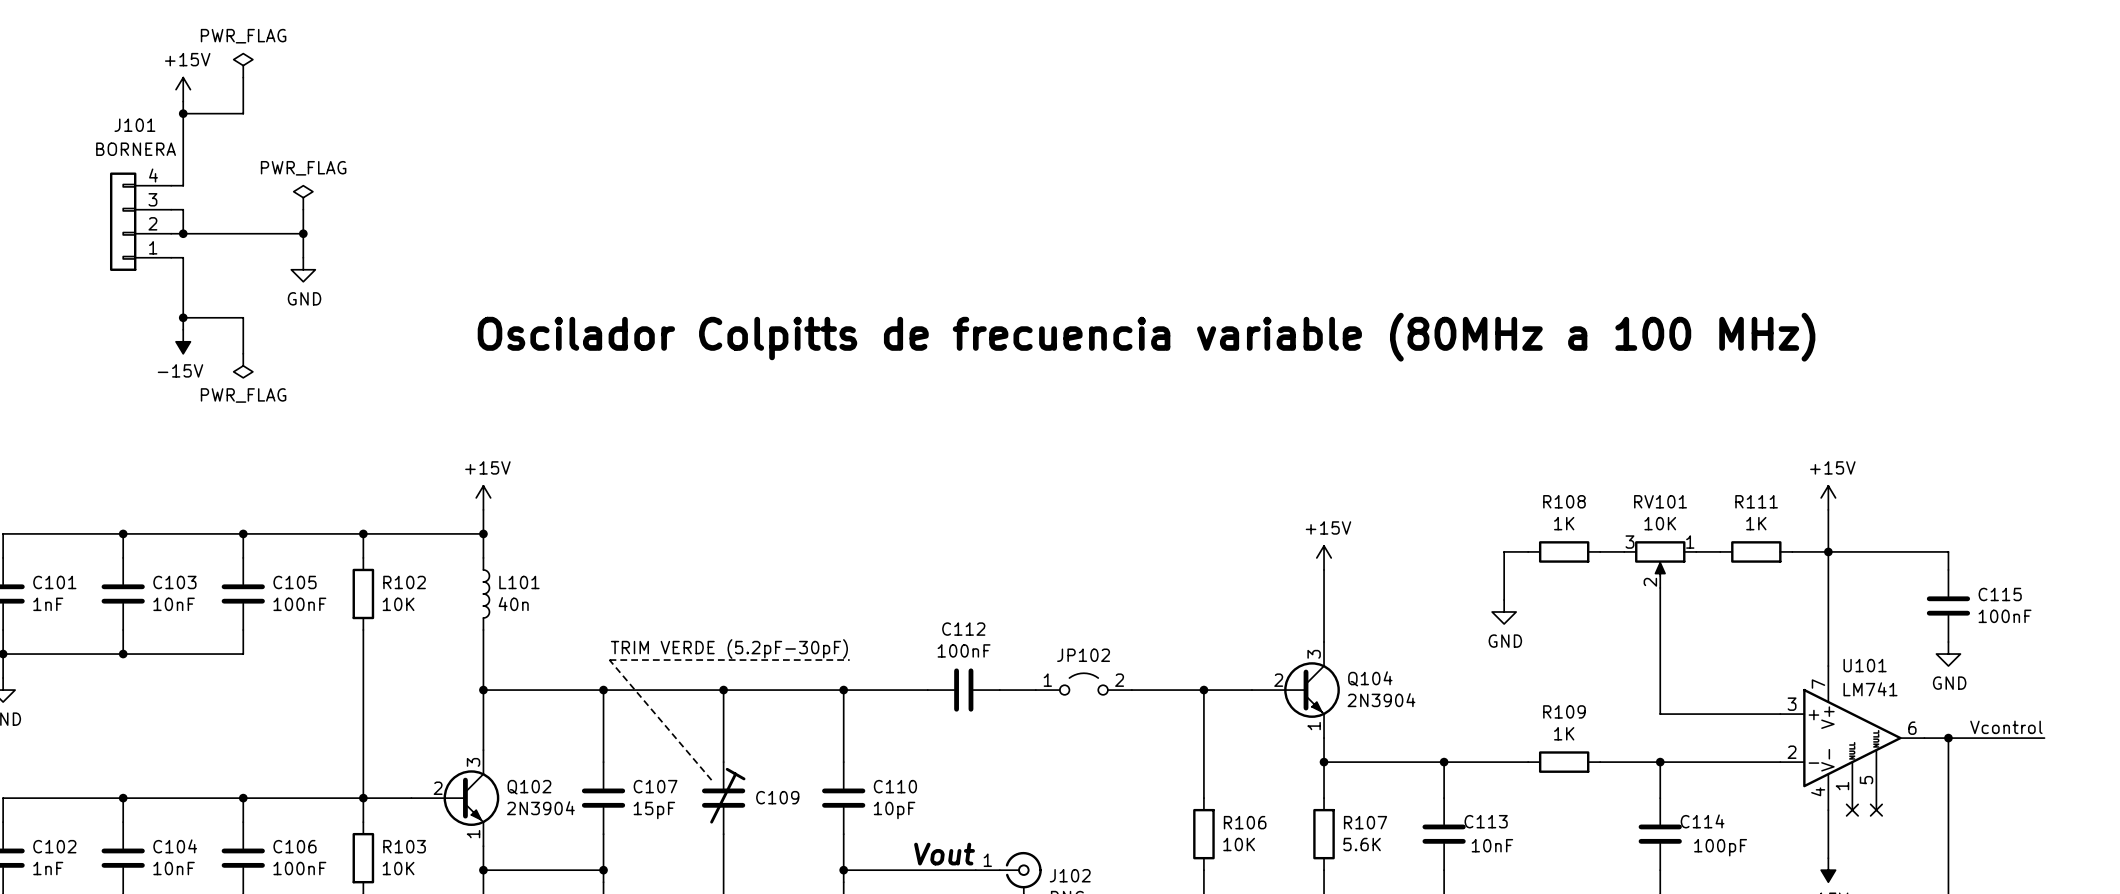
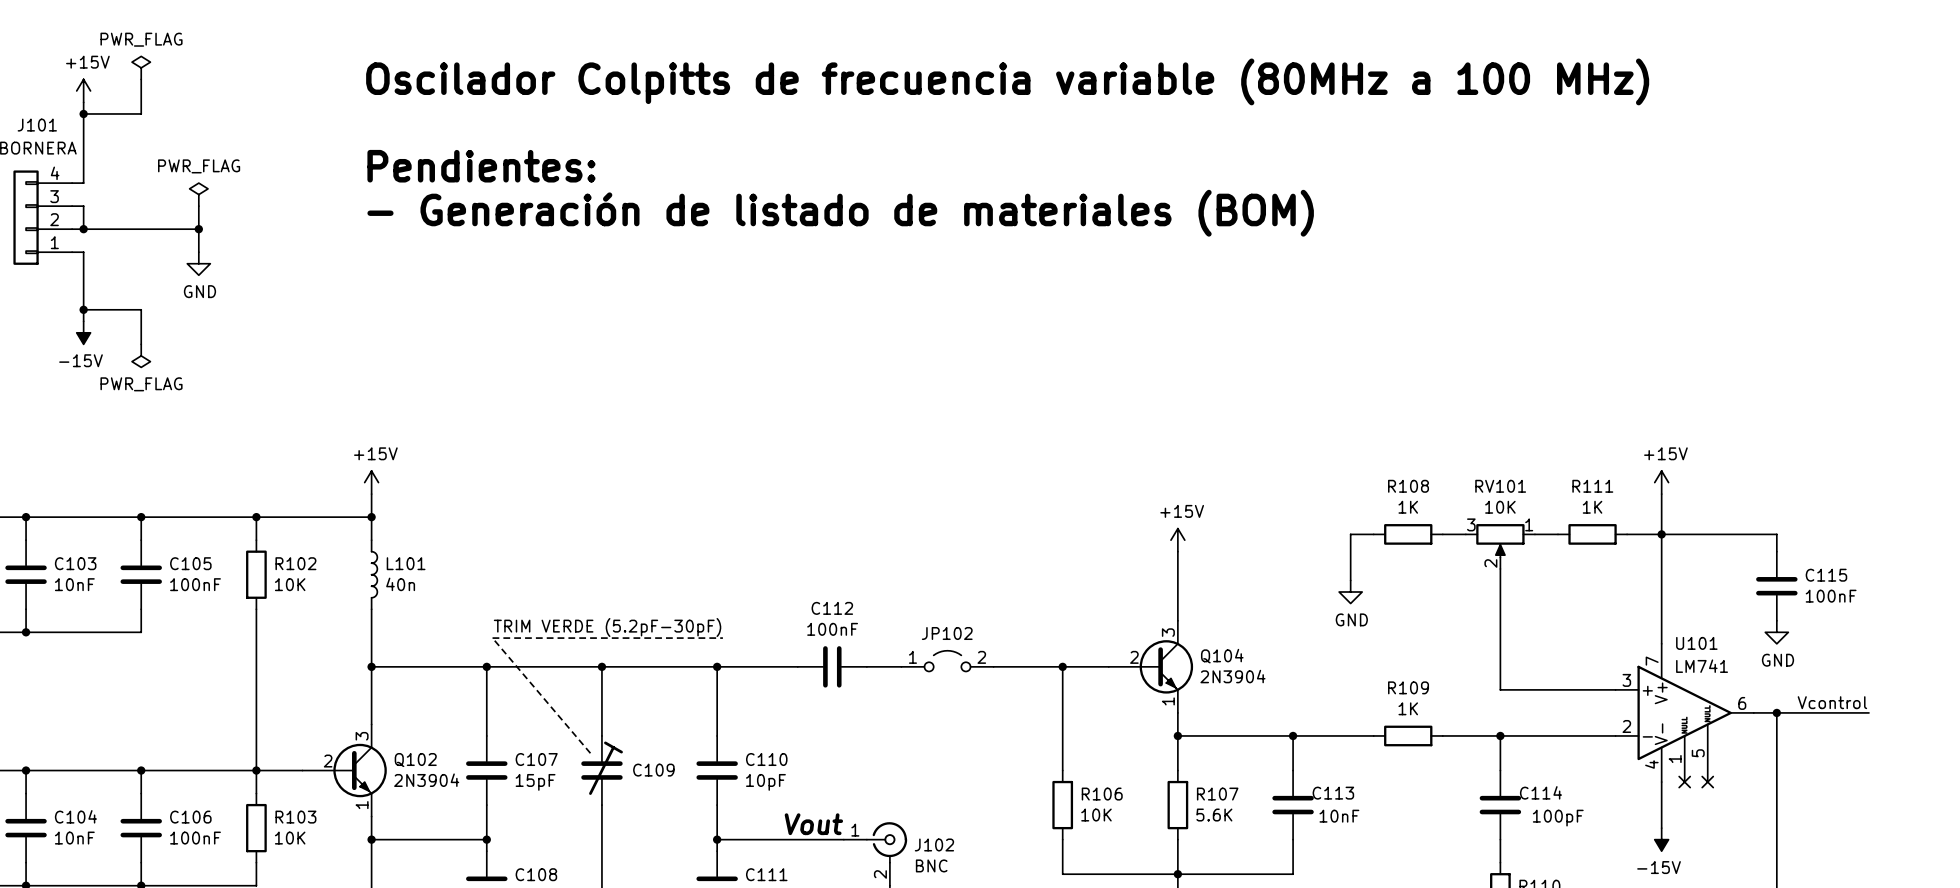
text: none -> Oscilador Colpitts de frecuencia variable (80MHz a 100 MHz) (1007, 81)
text: none -> Pendientes: (481, 166)
text: none -> - Generación de listado de materiales (BOM) (840, 213)
text: Oscilador Colpitts de frecuencia variable (80MHz a 100 MHz) (1146, 337) -> none

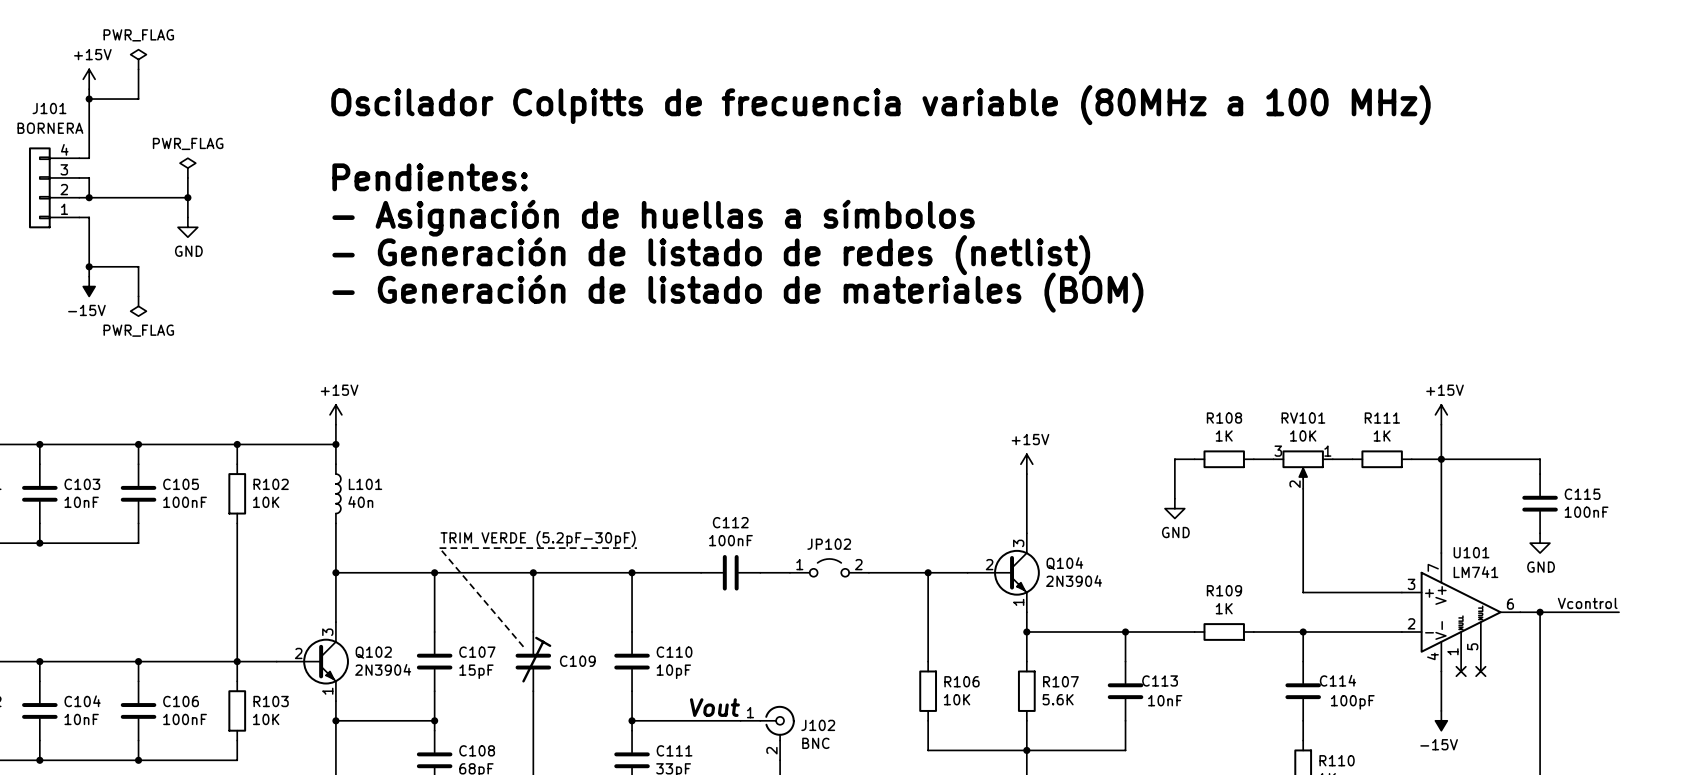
text position: Oscilador Colpitts de frecuencia variable (80MHz a 100 MHz) (1007, 81) -> Oscilador Colpitts de frecuencia variable (80MHz a 100 MHz) (880, 105)
text: Pendientes: (481, 166) -> none
text: - Generación de listado de materiales (BOM) (840, 213) -> Pendientes: (430, 177)
text: none -> - Asignación de huellas a símbolos (653, 218)
text: none -> - Generación de listado de redes (netlist) (711, 255)
text: none -> - Generación de listado de materiales (BOM) (737, 292)

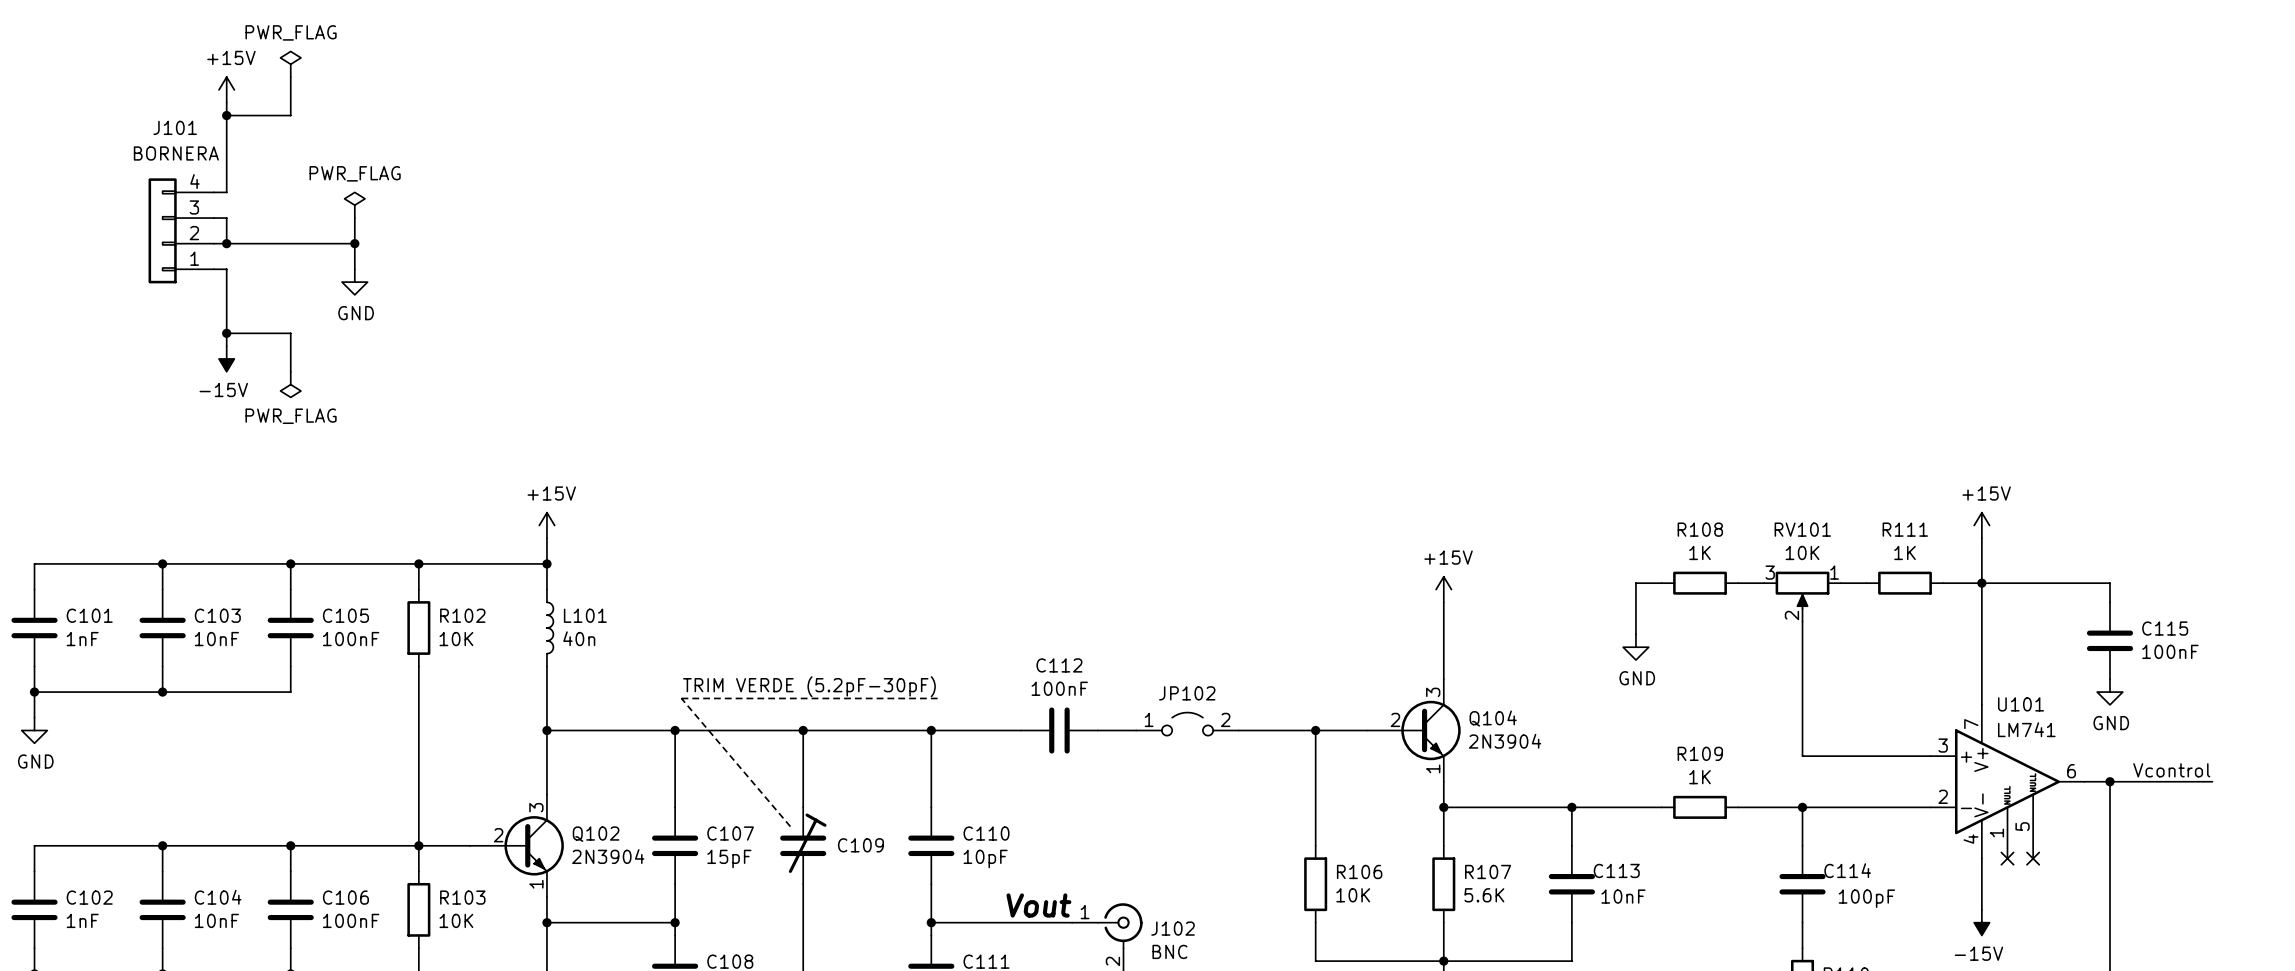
text: Oscilador Colpitts de frecuencia variable (80MHz a 100 MHz) (880, 105) -> none
text: Pendientes: (430, 177) -> none
text: - Asignación de huellas a símbolos (653, 218) -> none
text: - Generación de listado de redes (netlist) (711, 255) -> none
text: - Generación de listado de materiales (BOM) (737, 292) -> none

